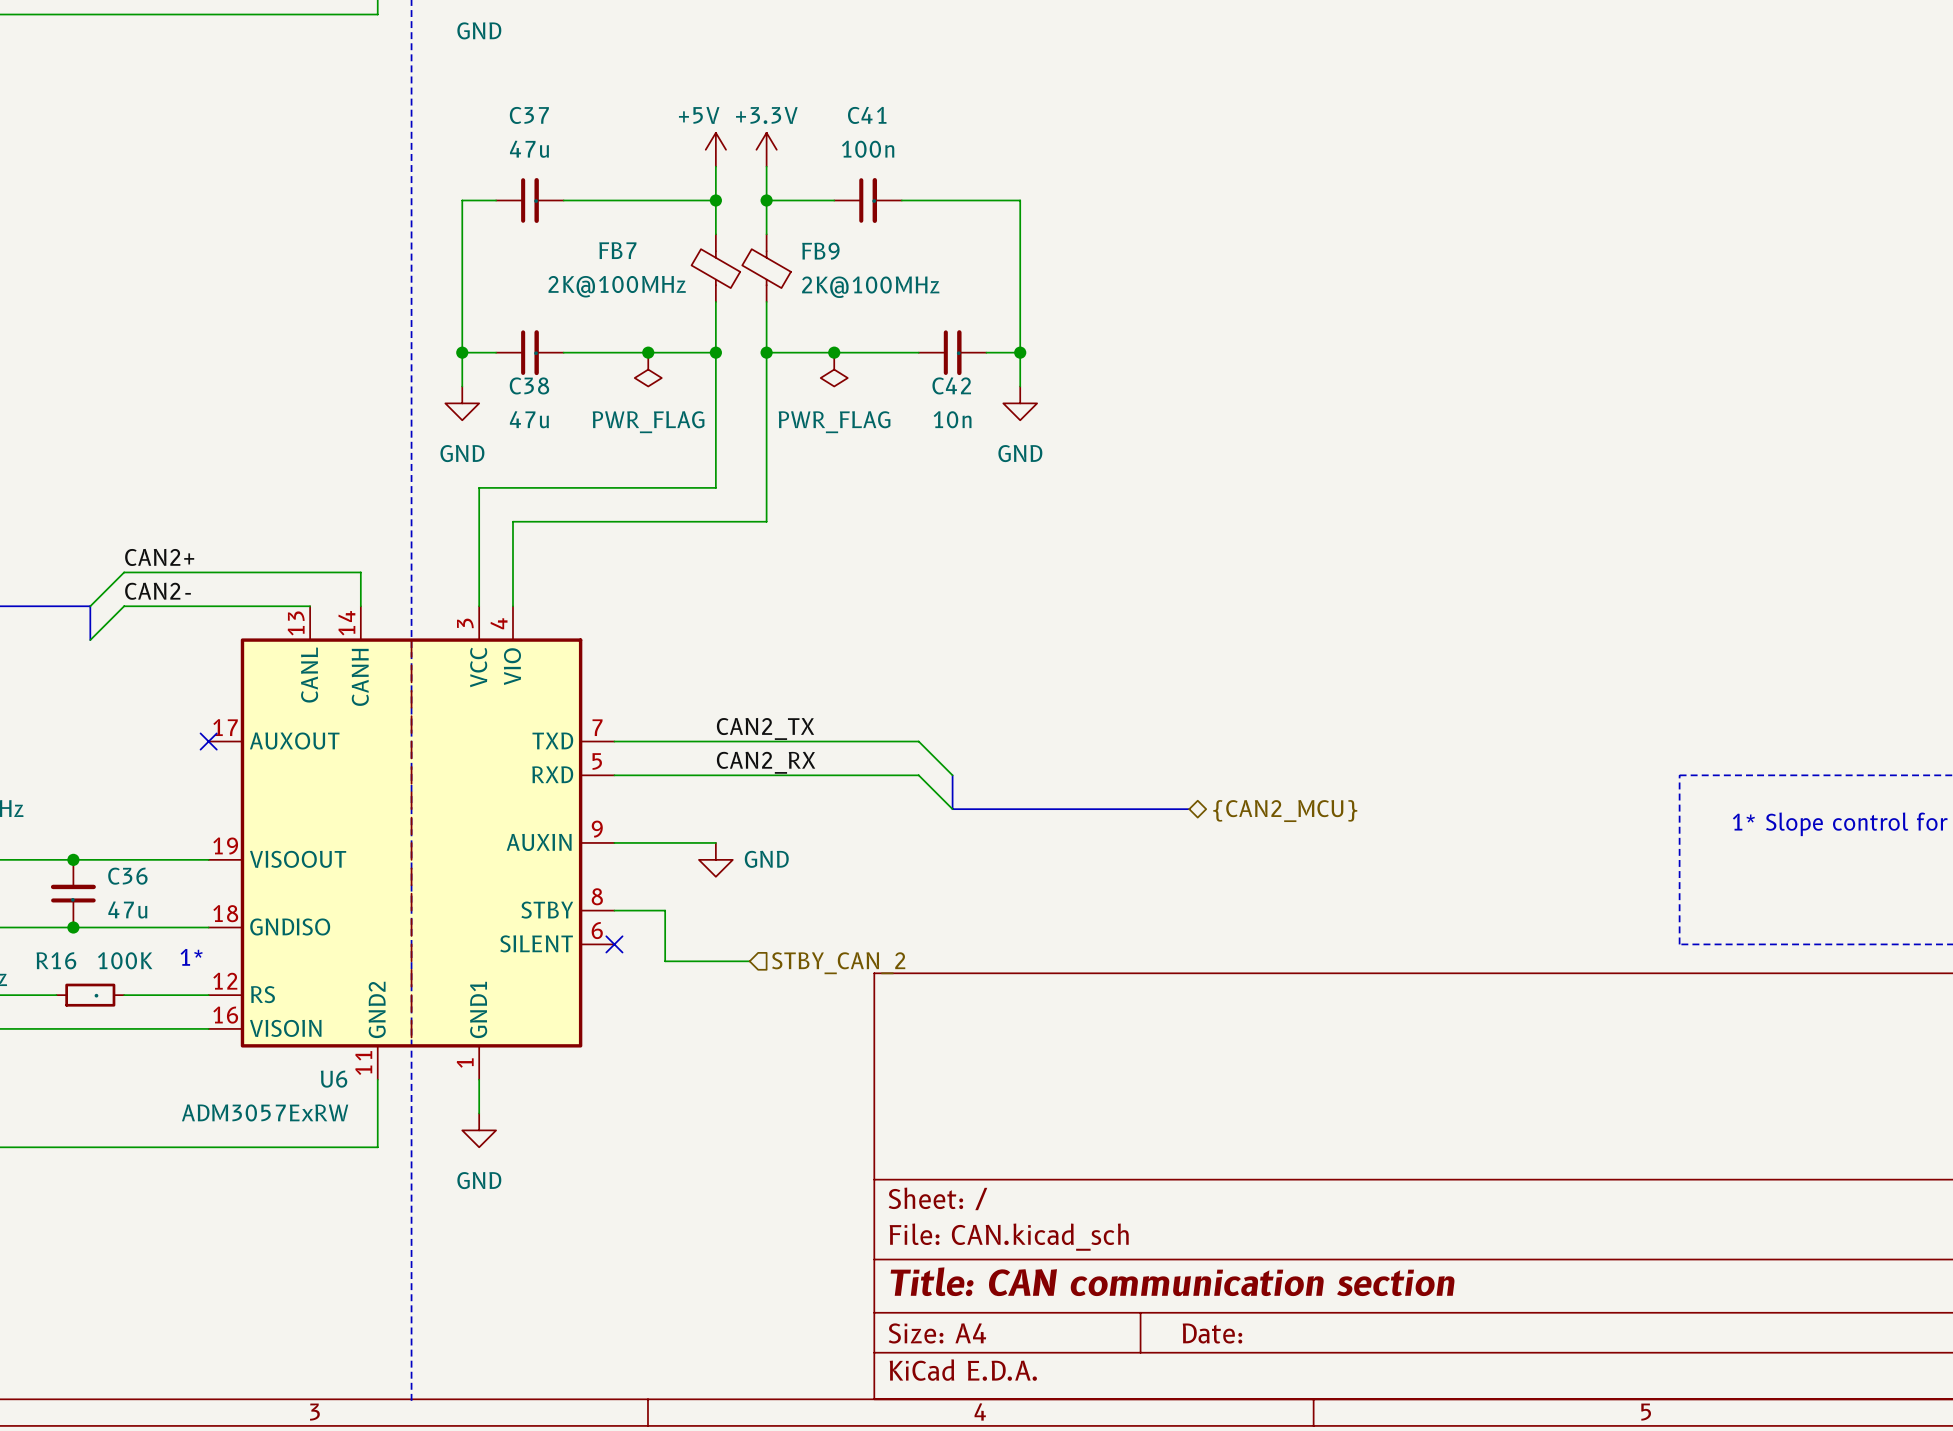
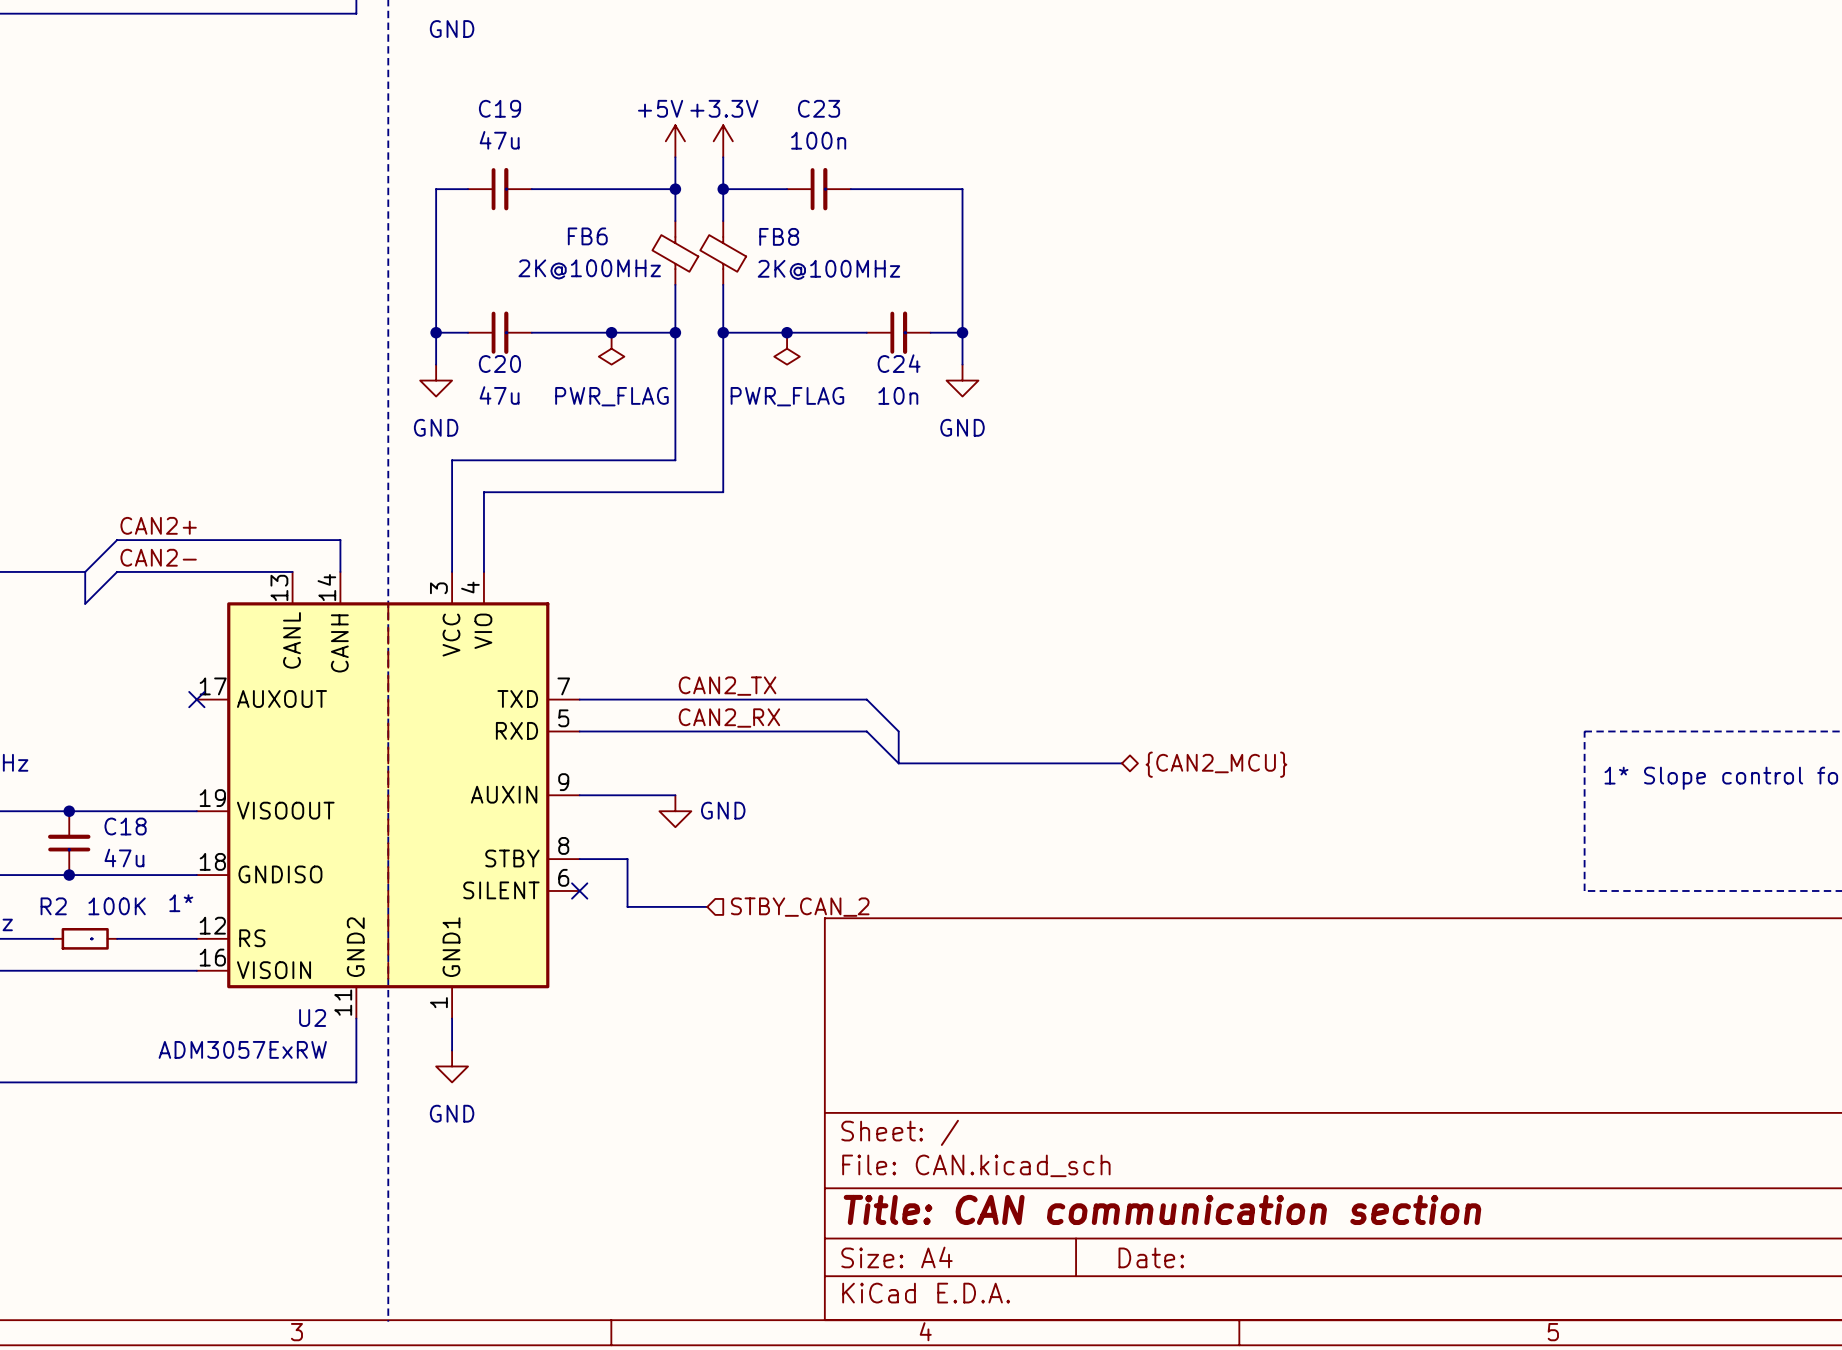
C37 name: C37 (529, 115) -> C19 (500, 108)
C41 name: C41 (867, 115) -> C23 (819, 108)
FB7 name: FB7 (617, 250) -> FB6 (587, 236)
FB9 name: FB9 (820, 251) -> FB8 (779, 236)
C38 name: C38 (529, 385) -> C20 (499, 364)
C42 name: C42 (951, 385) -> C24 (899, 363)
C36 name: C36 (127, 876) -> C18 (125, 826)
R16 name: R16 (56, 960) -> R2 (53, 906)
U6 name: U6 (334, 1079) -> U2 (312, 1018)

